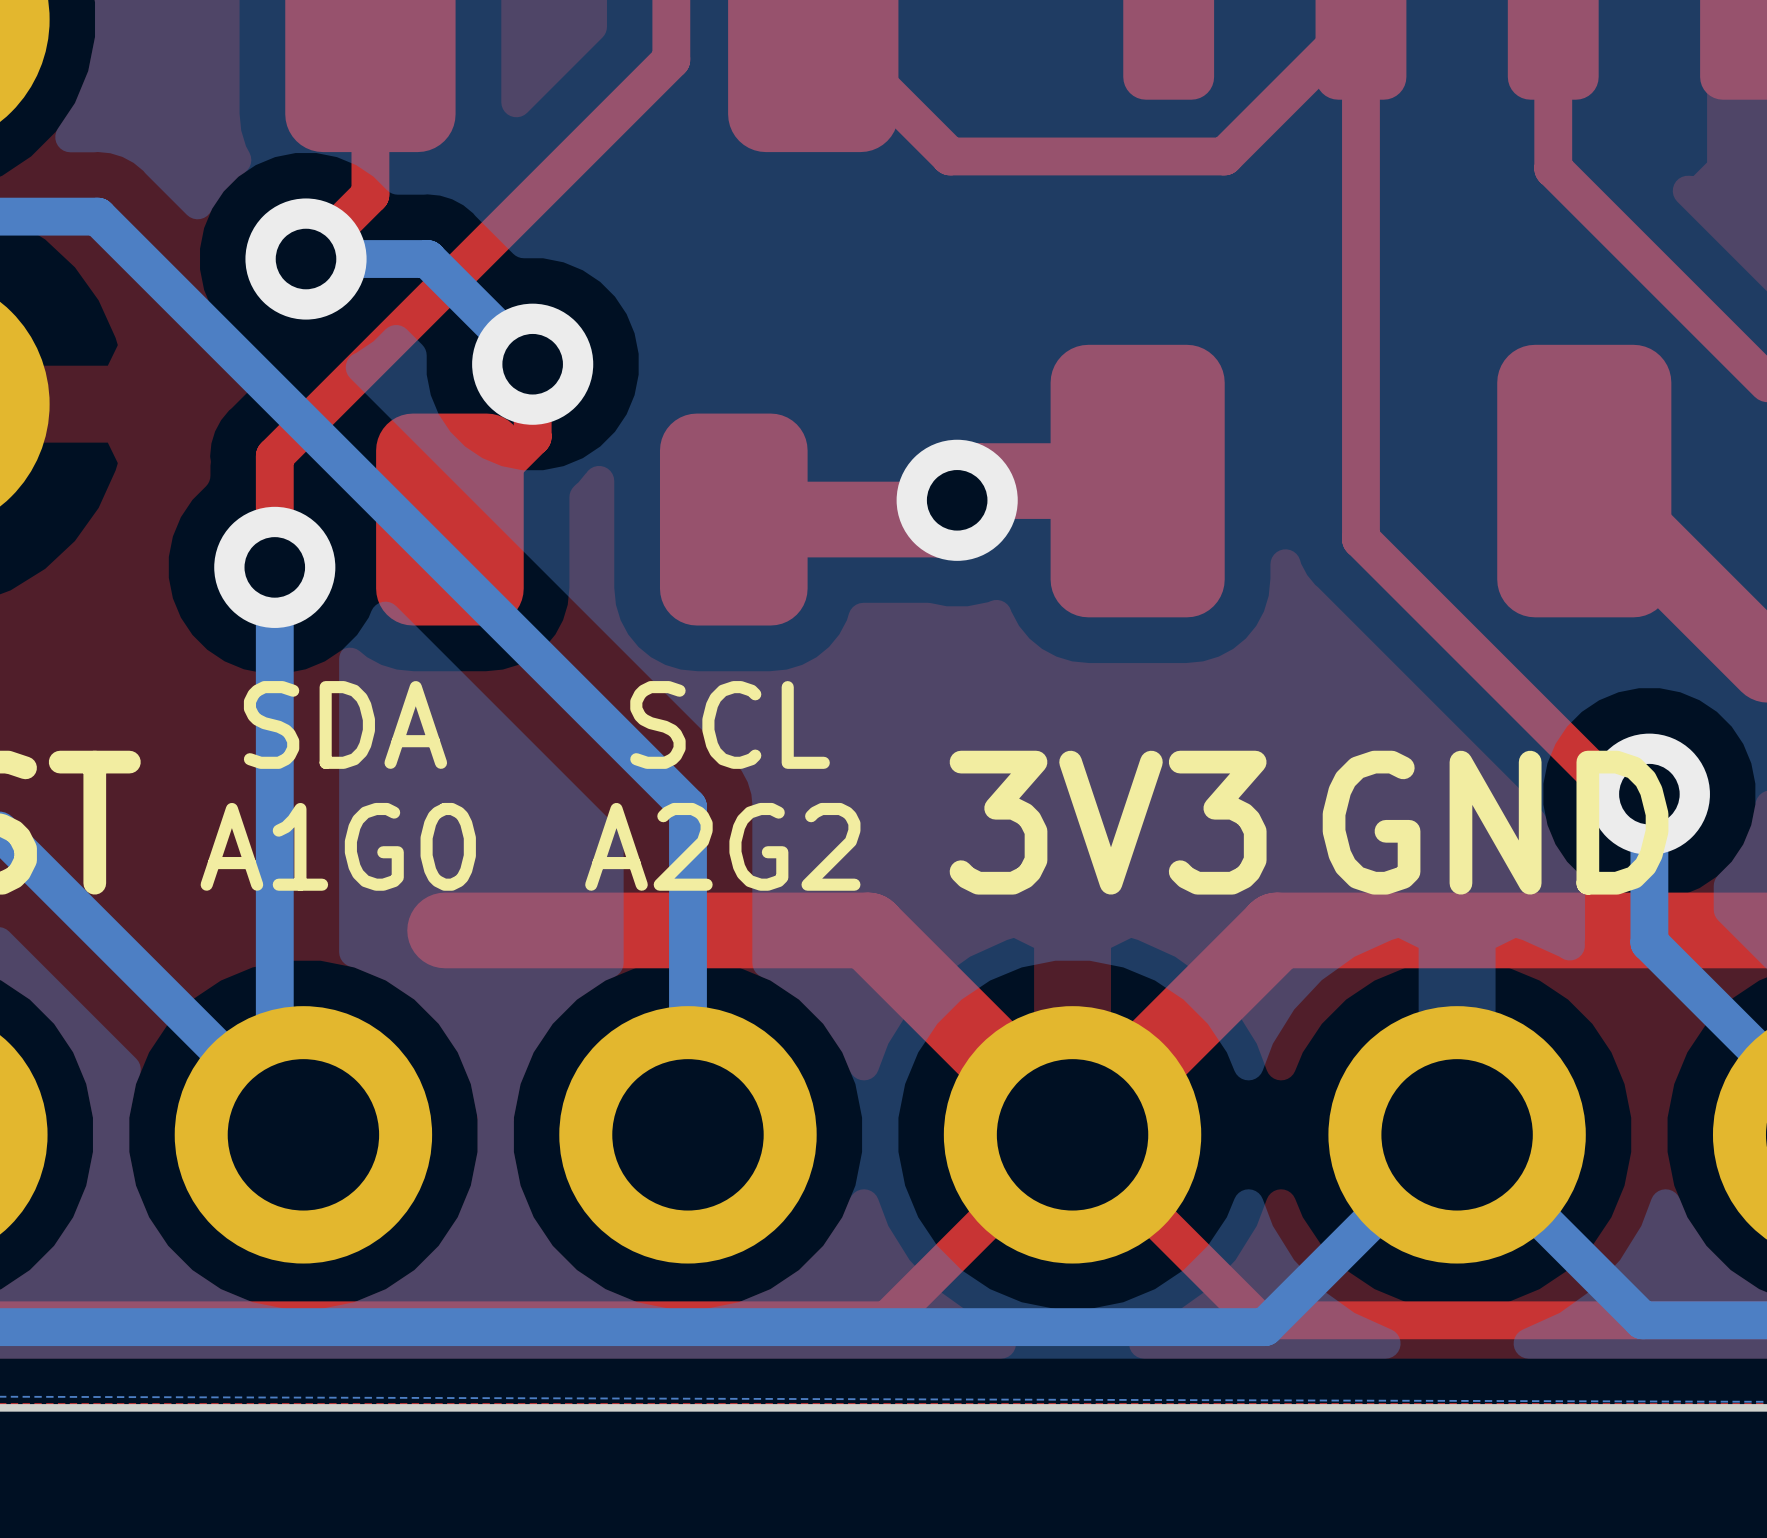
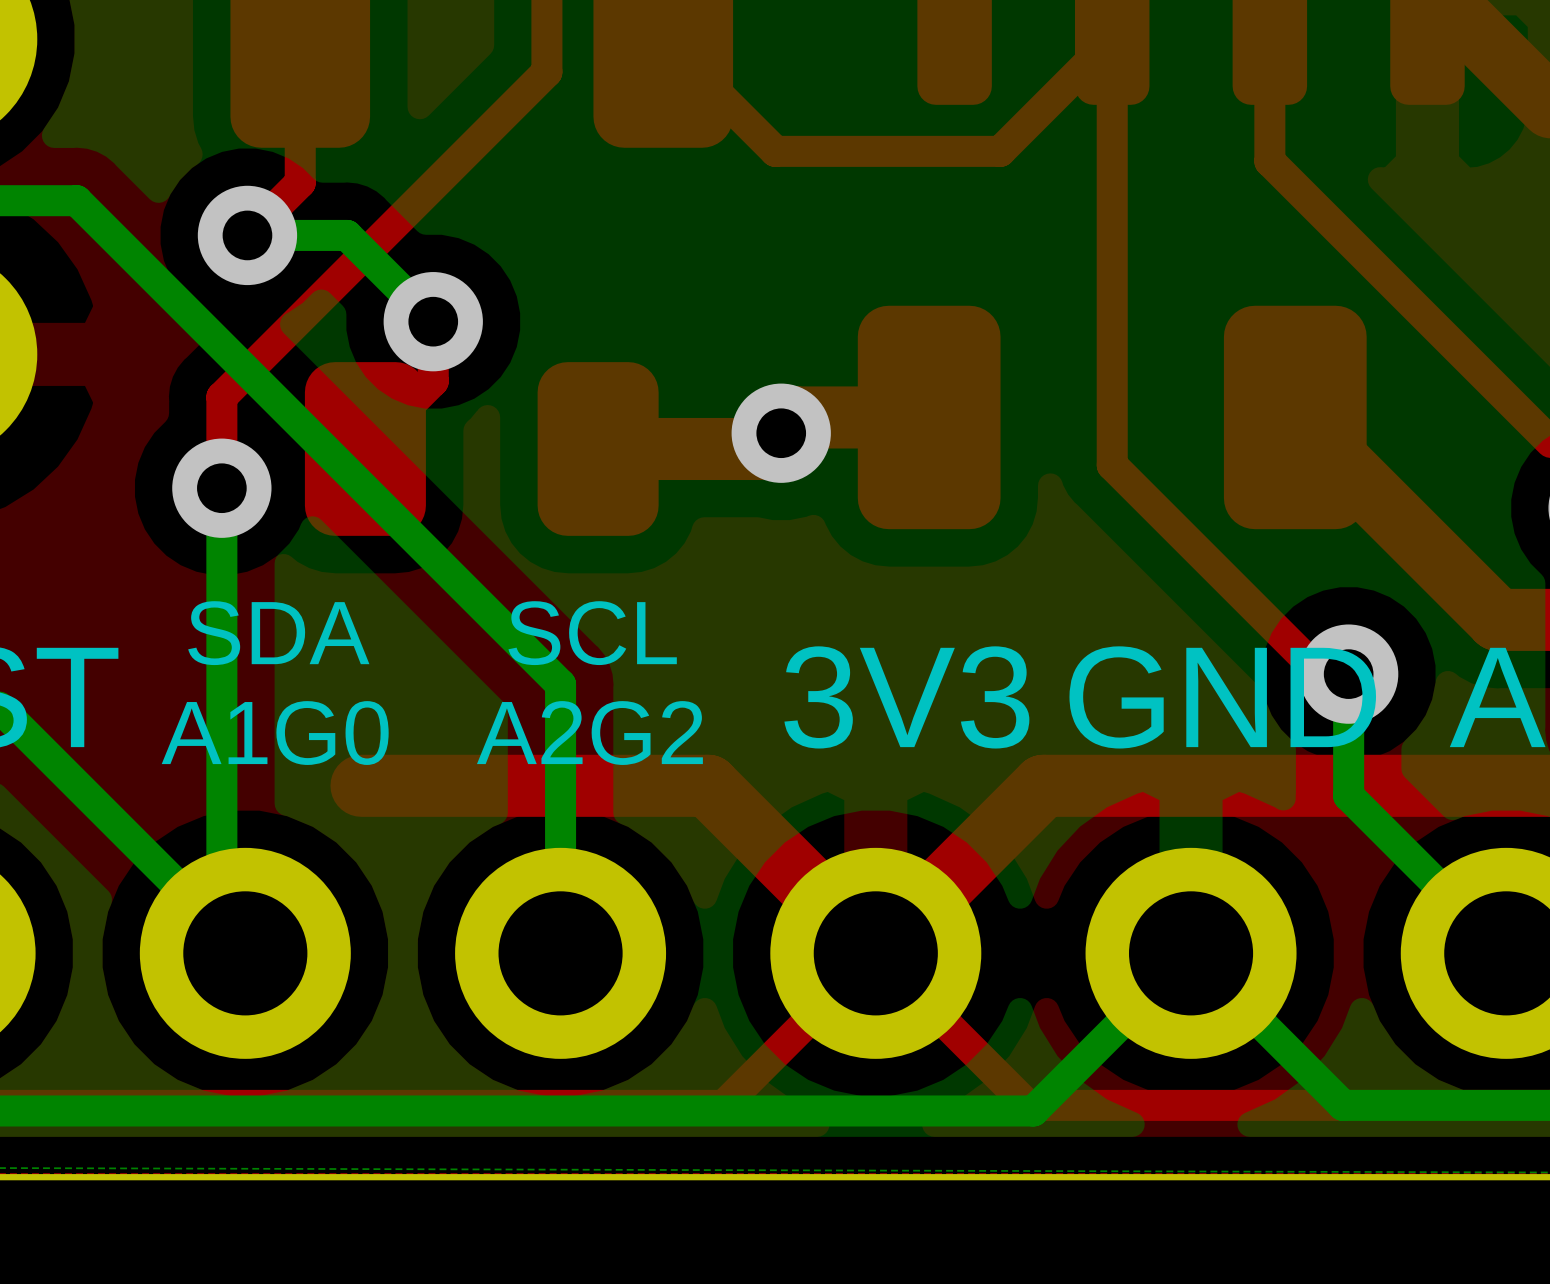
text position: SDA (345, 724) -> SDA (278, 633)
text position: SCL (730, 724) -> SCL (592, 633)
text position: A1G0 (338, 846) -> A1G0 (275, 733)
text position: A2G2 (722, 846) -> A2G2 (589, 733)

